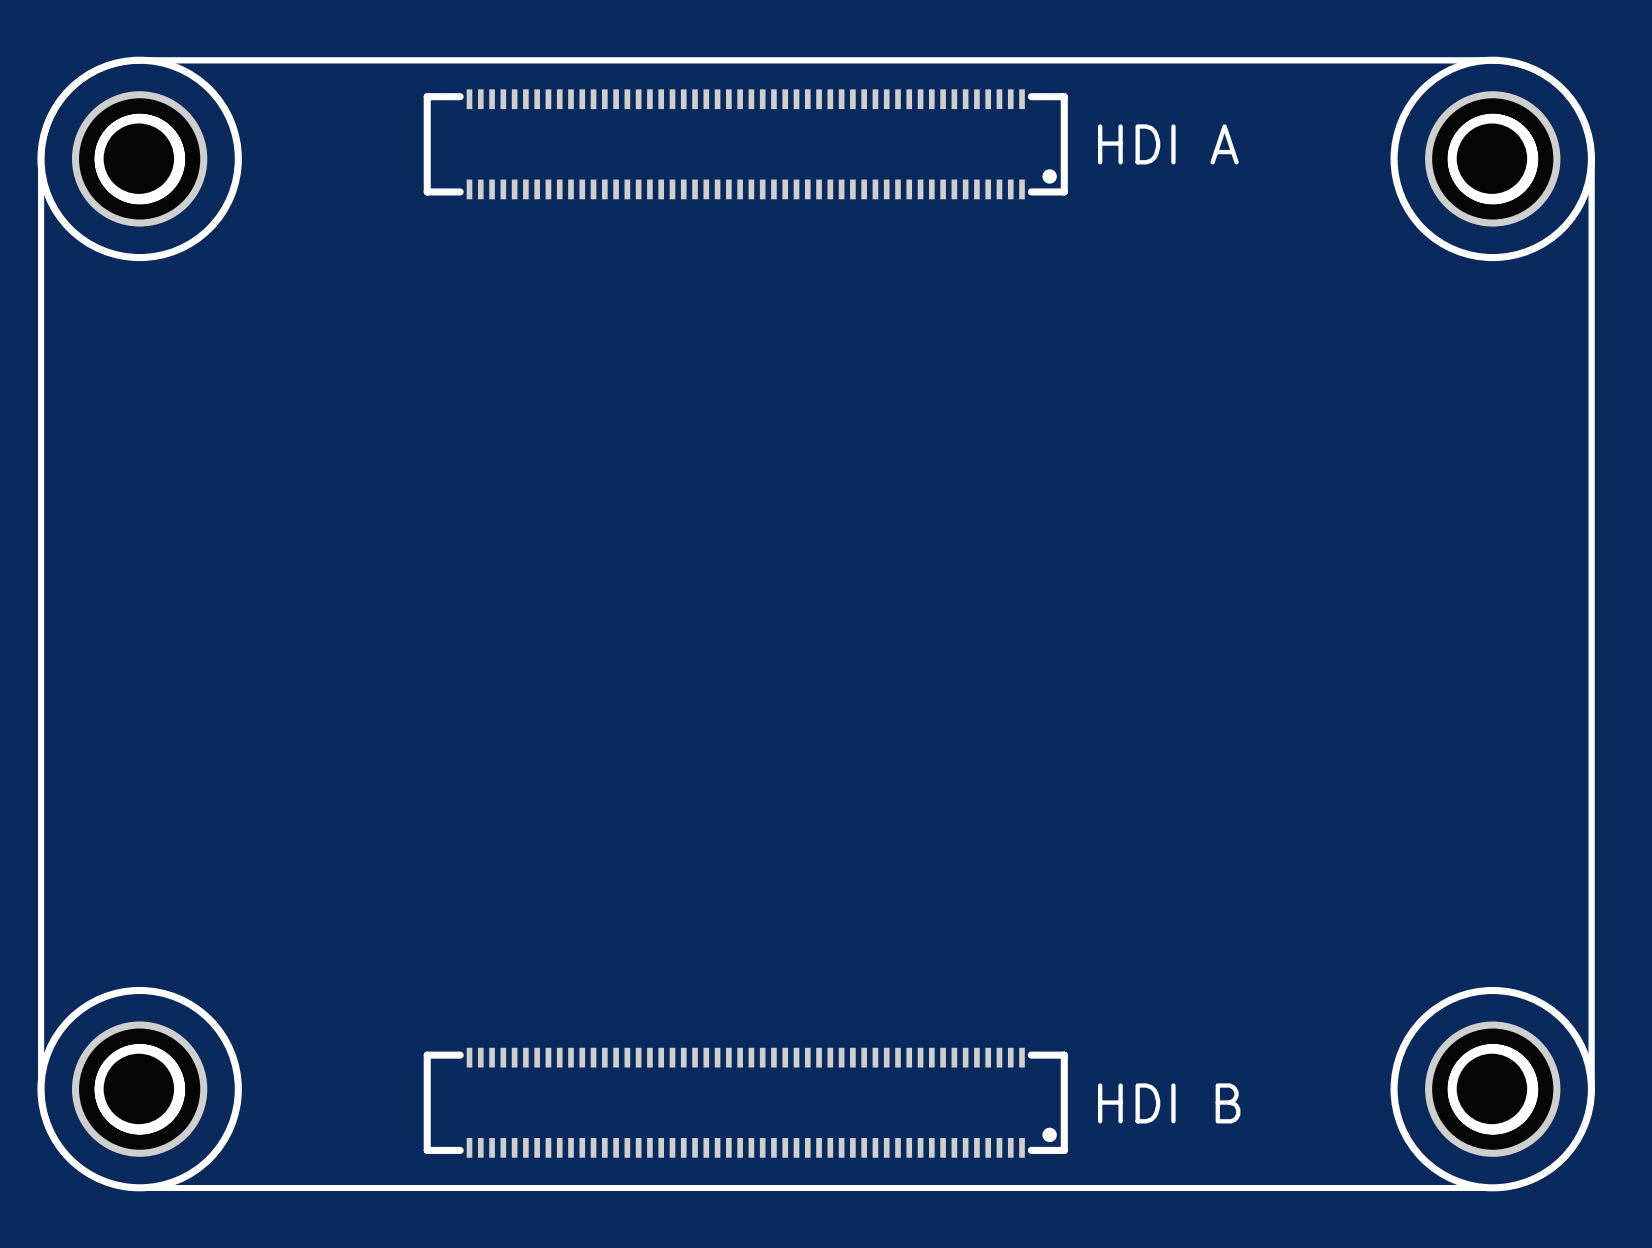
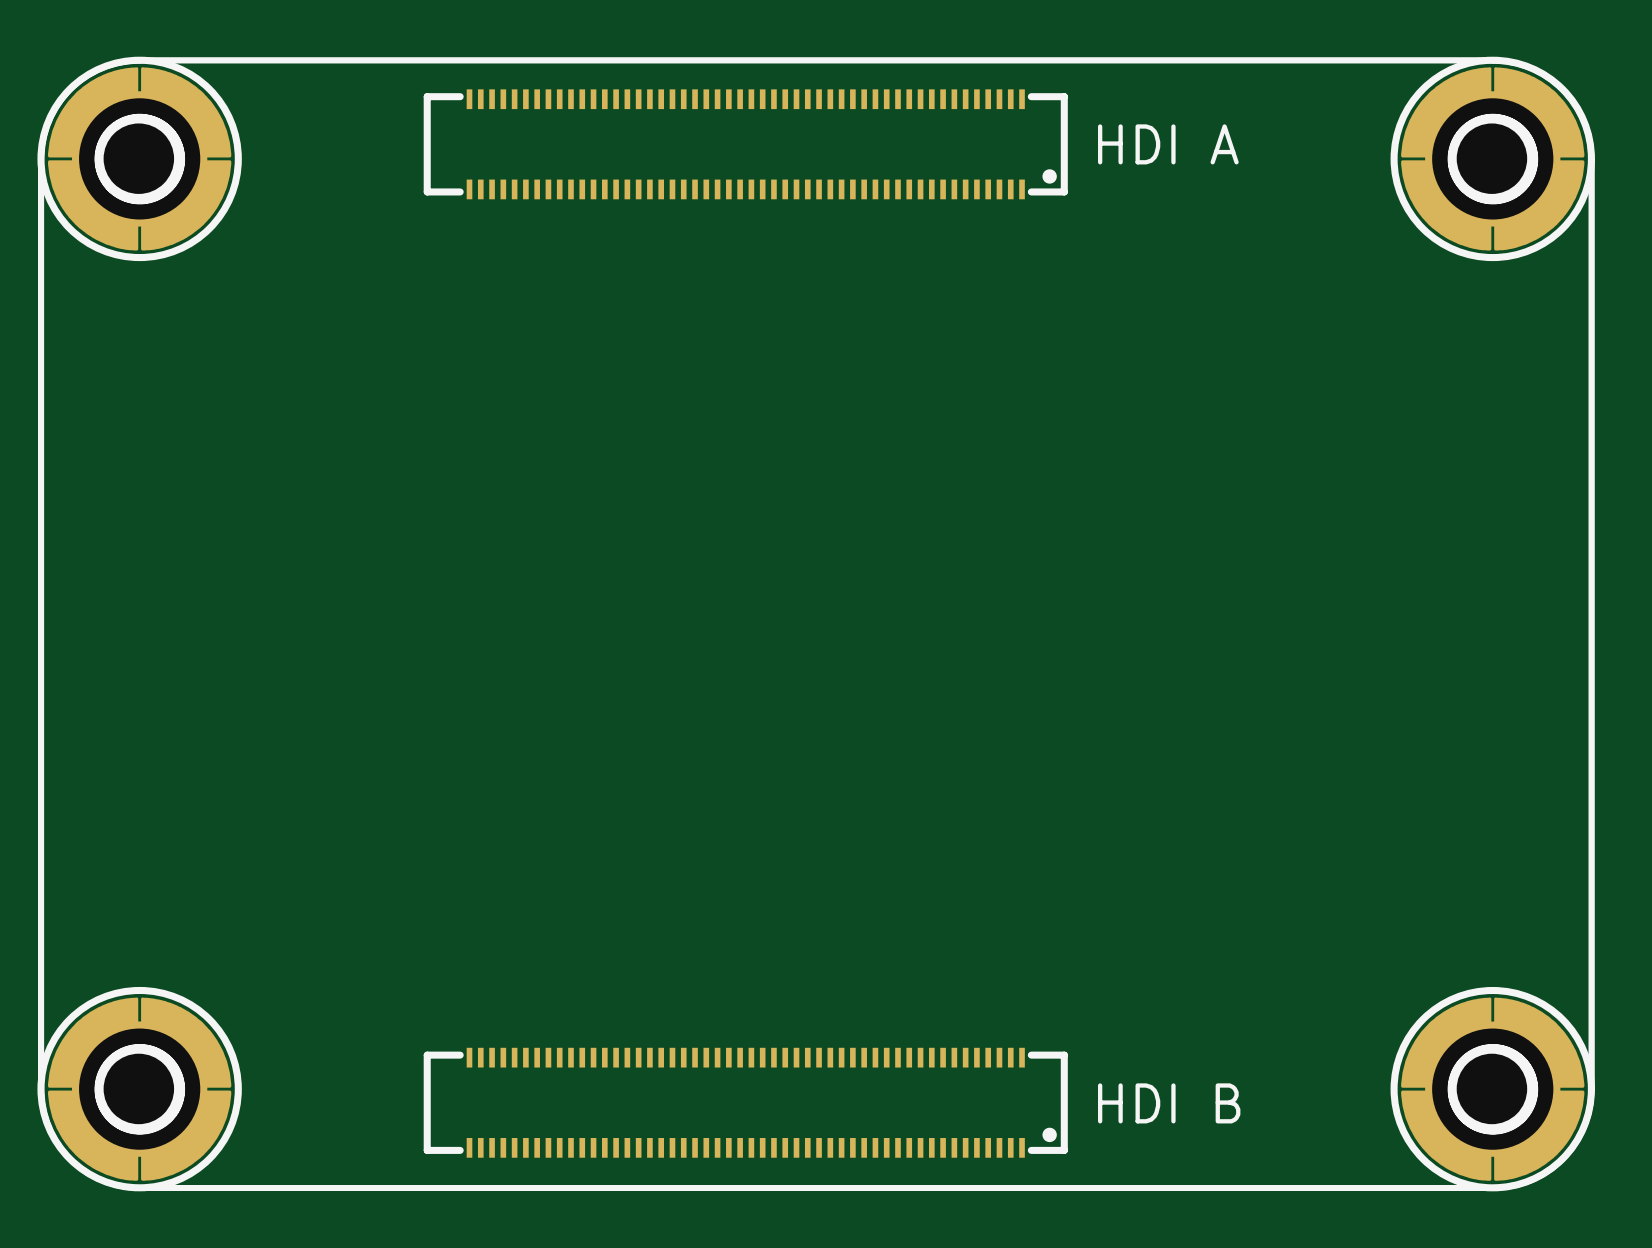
part footprint: [37, 56, 242, 262] -> [37, 56, 242, 262]
part footprint: [1390, 56, 1595, 262] -> [1390, 56, 1595, 262]
part footprint: [37, 986, 242, 1192] -> [37, 986, 242, 1192]
part footprint: [1390, 986, 1595, 1192] -> [1390, 986, 1595, 1192]

